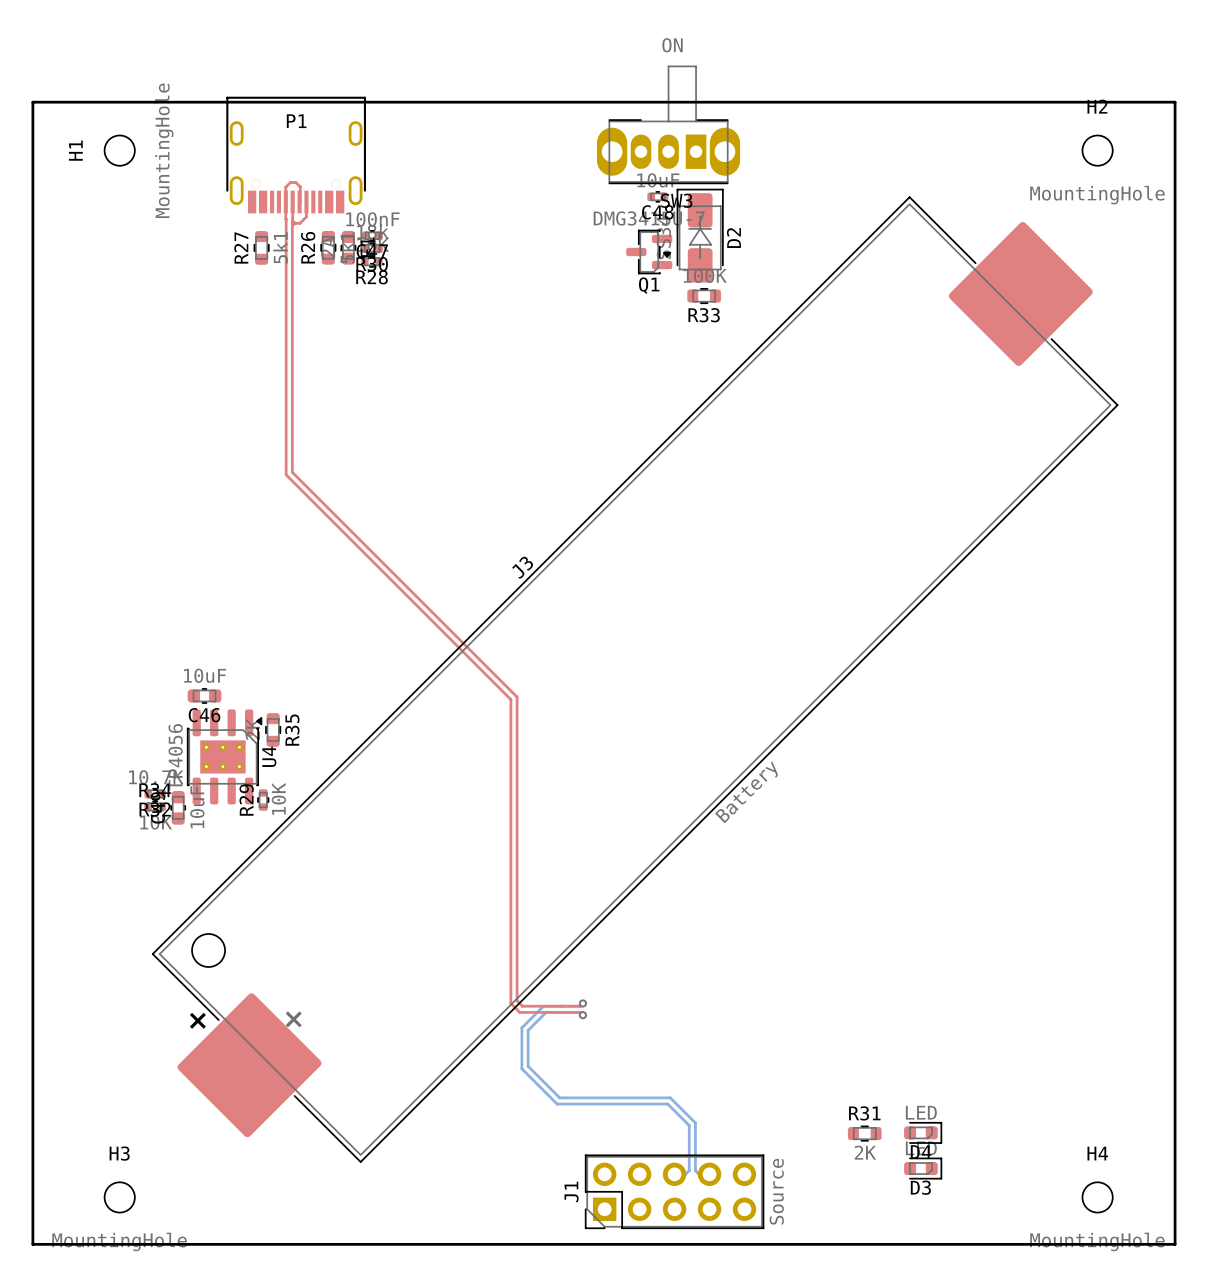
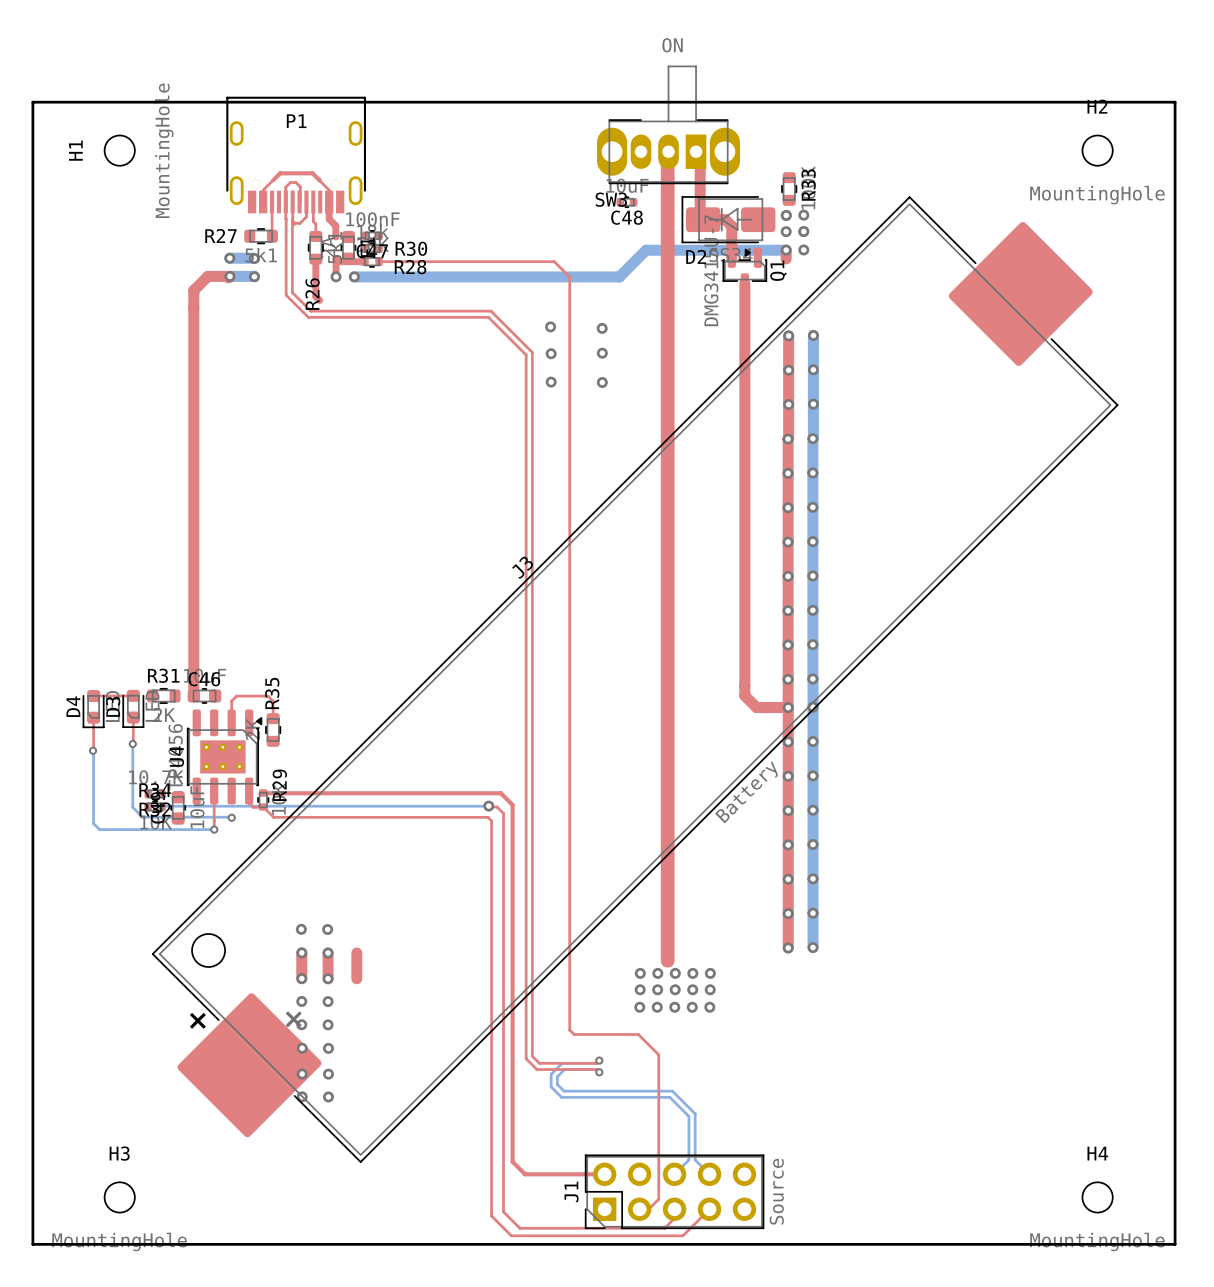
top track: none -> (696, 151) (700, 155) (700, 216) (703, 219) (725, 219) (731, 226) (731, 257)
top track: none -> (664, 155) (668, 151) (667, 960)
top track: none -> (273, 180) (263, 190) (263, 201)
top track: none -> (319, 180) (312, 173) (280, 173) (273, 180)
top track: none -> (319, 180) (329, 190) (329, 219) (335, 225) (336, 236)
C48 position: (657, 196) -> (626, 202)
SW3 name position: SW3 (676, 200) -> SW3 (611, 199)
top track: none -> (272, 201) (272, 236)
top track: none -> (313, 201) (315, 236)
via: none -> (786, 215)
via: none -> (803, 215)
via: none -> (786, 231)
via: none -> (803, 231)
D2 rotation: 0° (700, 235) -> 90° counterclockwise (728, 219)
D2 name position: D2 (733, 238) -> D2 (696, 256)
R27 rotation: 0° (261, 247) -> 90° clockwise (261, 236)
R26 name position: R26 (308, 247) -> R26 (312, 294)
R26 position: (328, 247) -> (315, 247)
via: none -> (803, 249)
top track: none -> (786, 250) (786, 258)
bottom track: none -> (786, 250) (646, 250) (619, 276) (354, 276)
via: none -> (786, 250)
Q1 rotation: 0° (649, 252) -> 90° counterclockwise (744, 270)
Q1 position: (649, 252) -> (744, 270)
bottom track: none -> (229, 258) (254, 258)
via: none -> (229, 258)
via: none -> (254, 258)
top track: none -> (315, 259) (315, 296) (319, 300)
top track: none -> (364, 261) (339, 261) (336, 258) (336, 276)
top track: none -> (378, 261) (554, 261) (569, 277) (569, 1030) (574, 1034) (638, 1034) (658, 1054) (658, 1199) (648, 1209) (639, 1209)
R30 name position: R30 (372, 264) -> R30 (411, 248)
bottom track: none -> (229, 276) (254, 276)
via: none -> (229, 276)
via: none -> (254, 276)
via: none -> (336, 276)
via: none -> (354, 276)
top track: none -> (228, 277) (229, 276) (207, 276) (193, 290) (193, 695)
R28 name position: R28 (372, 277) -> R28 (410, 267)
top track: none -> (744, 283) (744, 695) (756, 707) (788, 707) (788, 335)
top track: (292, 292) (292, 472) (517, 697) (517, 1000) (522, 1006) (580, 1006) (582, 1003) -> (292, 292) (310, 311) (491, 311) (532, 352) (532, 1056) (539, 1063) (596, 1063) (599, 1060)
top track: (286, 295) (286, 474) (510, 699) (510, 1003) (519, 1012) (580, 1012) (582, 1015) -> (286, 295) (308, 317) (488, 317) (526, 355) (526, 1058) (536, 1069) (596, 1069) (599, 1072)
R33 rotation: 0° (704, 296) -> 90° clockwise (789, 189)
R33 position: (704, 296) -> (789, 189)
R33 name position: R33 (704, 315) -> R33 (808, 185)
via: none -> (550, 326)
via: none -> (602, 328)
via: none -> (788, 335)
bottom track: none -> (813, 335) (813, 438)
via: none -> (813, 335)
via: none -> (551, 353)
via: none -> (602, 353)
via: none -> (813, 369)
via: none -> (788, 370)
via: none -> (551, 382)
via: none -> (602, 382)
via: none -> (788, 404)
via: none -> (813, 404)
bottom track: none -> (812, 438) (812, 678)
via: none -> (812, 438)
via: none -> (788, 439)
via: none -> (812, 472)
via: none -> (788, 473)
via: none -> (788, 507)
via: none -> (812, 507)
via: none -> (812, 541)
via: none -> (788, 542)
via: none -> (812, 575)
via: none -> (788, 576)
via: none -> (788, 610)
via: none -> (812, 610)
via: none -> (812, 644)
via: none -> (788, 645)
via: none -> (812, 678)
via: none -> (788, 679)
bottom track: none -> (813, 679) (813, 947)
top track: none -> (93, 695) (133, 695)
top track: none -> (788, 707) (788, 947)
via: none -> (788, 707)
via: none -> (813, 707)
C46 name position: C46 (204, 715) -> C46 (204, 679)
top track: none -> (93, 717) (93, 750)
top track: none -> (133, 717) (132, 744)
top track: none -> (273, 718) (273, 701) (267, 696) (236, 696) (231, 701) (231, 722)
R35 name position: R35 (292, 730) -> R35 (272, 693)
via: none -> (788, 741)
via: none -> (813, 741)
bottom track: none -> (132, 744) (132, 807) (142, 817) (231, 817)
via: none -> (132, 744)
bottom track: none -> (93, 750) (93, 823) (99, 829) (214, 829)
via: none -> (93, 750)
U4 name position: U4 (269, 756) -> U4 (177, 756)
via: none -> (813, 775)
via: none -> (788, 776)
top track: none -> (214, 791) (214, 829)
top track: none -> (249, 791) (249, 803) (253, 807) (263, 807) (273, 817) (487, 817) (491, 820) (491, 1216) (511, 1235) (682, 1235) (709, 1209)
top track: none -> (263, 793) (500, 793) (512, 804) (512, 1161) (525, 1174) (604, 1174)
R29 name position: R29 (246, 799) -> R29 (279, 785)
bottom track: none -> (147, 806) (488, 806)
top track: none -> (488, 806) (497, 807) (503, 813) (503, 1211) (519, 1228) (664, 1228) (674, 1218) (674, 1209)
via: none -> (488, 806)
via: none -> (788, 810)
via: none -> (813, 810)
via: none -> (231, 817)
via: none -> (214, 829)
via: none -> (788, 844)
via: none -> (813, 844)
via: none -> (813, 878)
via: none -> (788, 879)
via: none -> (788, 913)
via: none -> (813, 913)
via: none -> (301, 929)
via: none -> (327, 929)
via: none -> (788, 947)
via: none -> (813, 947)
top track: none -> (301, 952) (301, 978)
via: none -> (301, 952)
top track: none -> (328, 953) (328, 978)
via: none -> (328, 953)
top track: none -> (356, 953) (356, 978)
via: none -> (640, 973)
via: none -> (657, 973)
via: none -> (675, 973)
via: none -> (692, 973)
via: none -> (710, 973)
via: none -> (301, 978)
via: none -> (328, 978)
via: none -> (640, 989)
via: none -> (657, 989)
via: none -> (675, 989)
via: none -> (692, 989)
via: none -> (710, 989)
via: none -> (301, 1001)
via: none -> (328, 1001)
bottom track: (582, 1003) (580, 1006) (543, 1006) (521, 1027) (521, 1068) (557, 1104) (667, 1104) (689, 1125) (689, 1170) (685, 1174) (674, 1174) -> none
via: (582, 1003) -> none
via: none -> (639, 1007)
via: none -> (657, 1007)
via: none -> (674, 1007)
via: none -> (692, 1007)
via: none -> (709, 1007)
bottom track: (582, 1015) (580, 1012) (546, 1012) (528, 1030) (528, 1066) (559, 1097) (670, 1097) -> (599, 1060) (596, 1063) (562, 1063) (551, 1074) (551, 1086) (561, 1097) (670, 1097)
via: (582, 1015) -> none
via: none -> (301, 1024)
via: none -> (328, 1024)
via: none -> (302, 1048)
via: none -> (328, 1048)
via: none -> (599, 1060)
bottom track: none -> (599, 1072) (596, 1069) (564, 1069) (557, 1076) (557, 1084) (564, 1091) (672, 1091) (695, 1113) (695, 1159) (709, 1174)
via: none -> (599, 1072)
via: none -> (302, 1074)
via: none -> (328, 1074)
via: none -> (302, 1096)
via: none -> (328, 1096)
bottom track: (688, 1116) (695, 1122) (695, 1170) (699, 1174) (709, 1174) -> (688, 1116) (688, 1159) (674, 1174)
D4 rotation: 0° (923, 1132) -> 90° clockwise (93, 709)
D4 position: (923, 1132) -> (93, 709)
R31 position: (864, 1133) -> (163, 695)
D3 rotation: 0° (923, 1168) -> 90° clockwise (133, 708)
D3 position: (923, 1168) -> (133, 708)

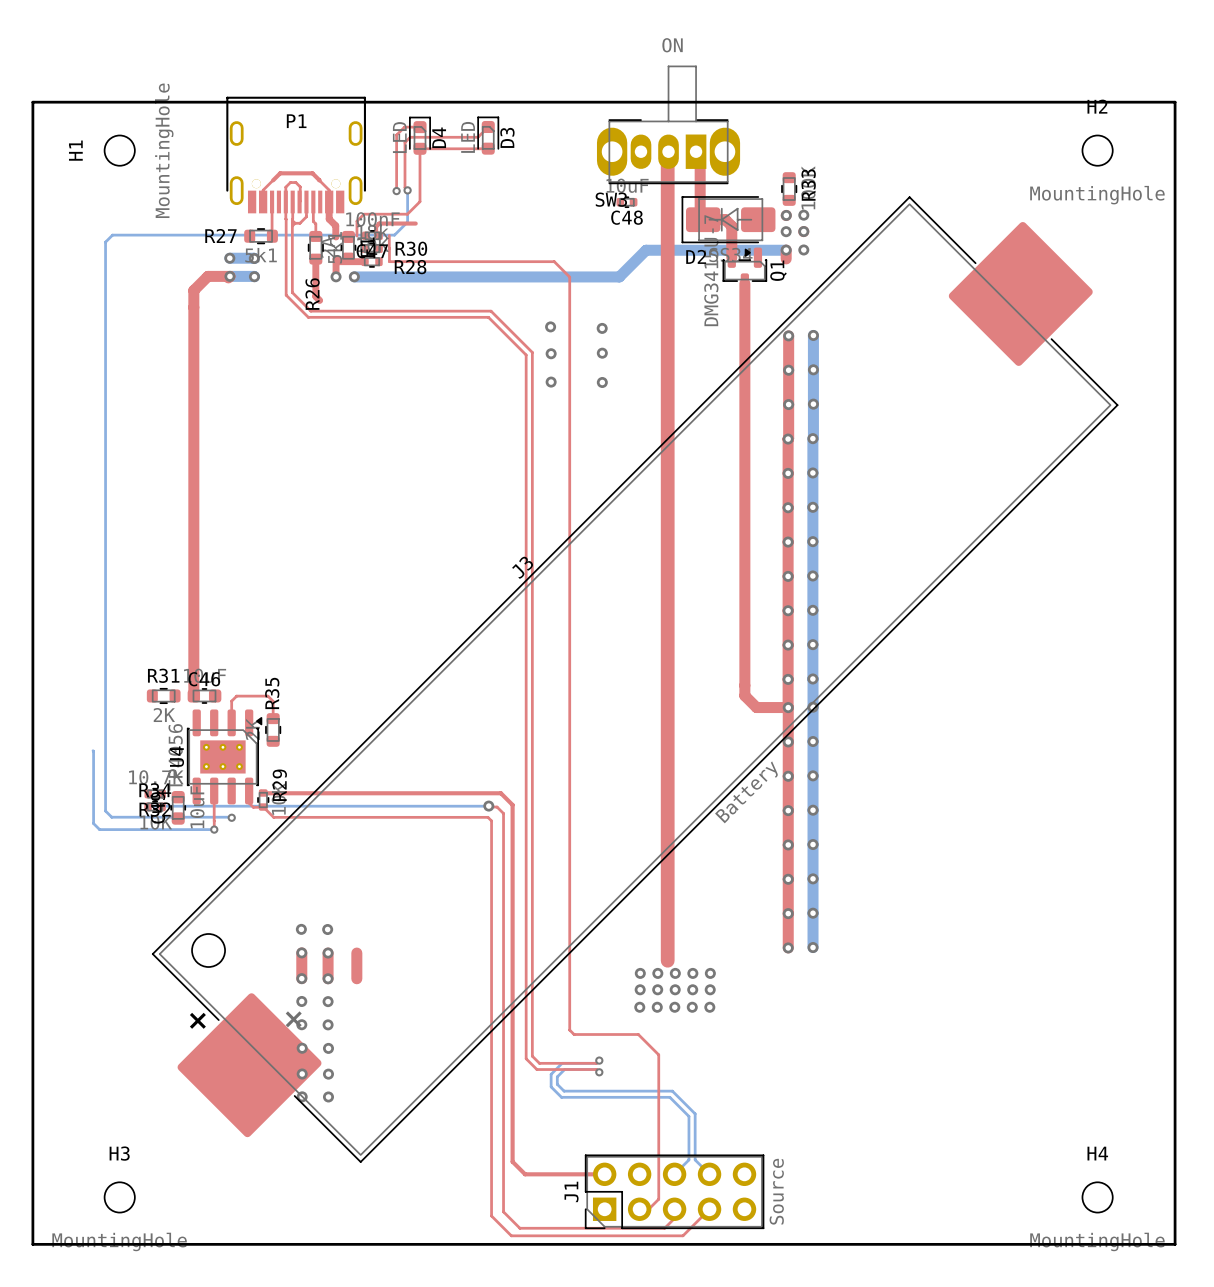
top track: none -> (488, 126) (477, 137) (410, 137) (404, 142) (404, 187) (407, 190)
top track: none -> (419, 127) (404, 127) (396, 135) (396, 191)
top track: none -> (484, 148) (419, 148) (419, 201) (407, 214) (363, 214) (356, 221) (356, 236)
via: none -> (407, 190)
via: none -> (396, 191)
top track: none -> (415, 223) (379, 223) (376, 226) (376, 235)
top track: none -> (389, 235) (389, 248)
top track: (378, 261) (389, 261) -> (389, 248) (389, 261)
top track: (93, 695) (133, 695) -> none
D3 rotation: 0° (133, 708) -> 180° (488, 135)
D3 position: (133, 708) -> (488, 135)
D4 rotation: 0° (93, 709) -> 180° (419, 135)
D4 position: (93, 709) -> (419, 135)
top track: (93, 717) (93, 750) -> none
top track: (133, 717) (132, 744) -> none
bottom track: (132, 744) (132, 807) (142, 817) -> (407, 190) (407, 222) (394, 235) (112, 235) (105, 242) (105, 811) (111, 817) (142, 817)
via: (132, 744) -> none
via: (93, 750) -> none

